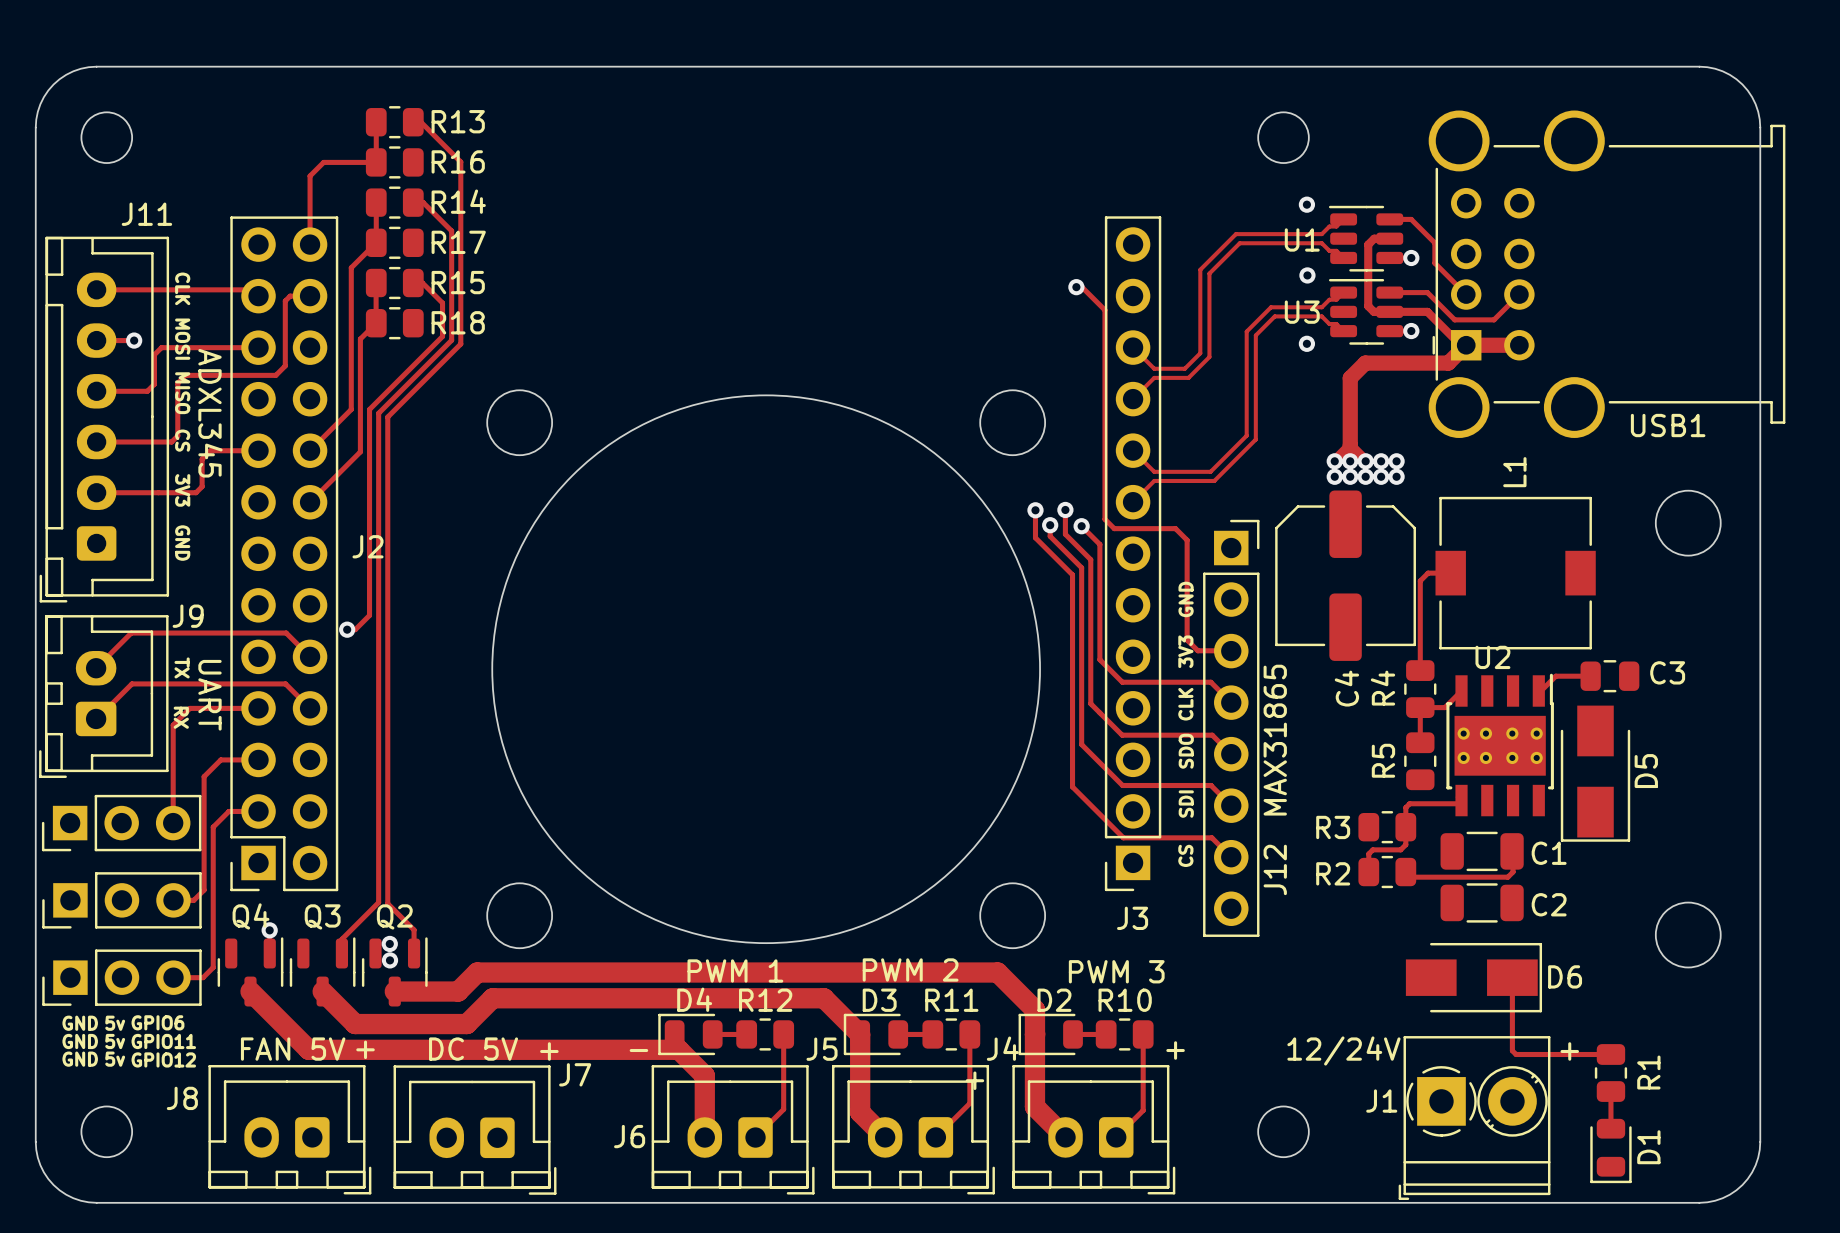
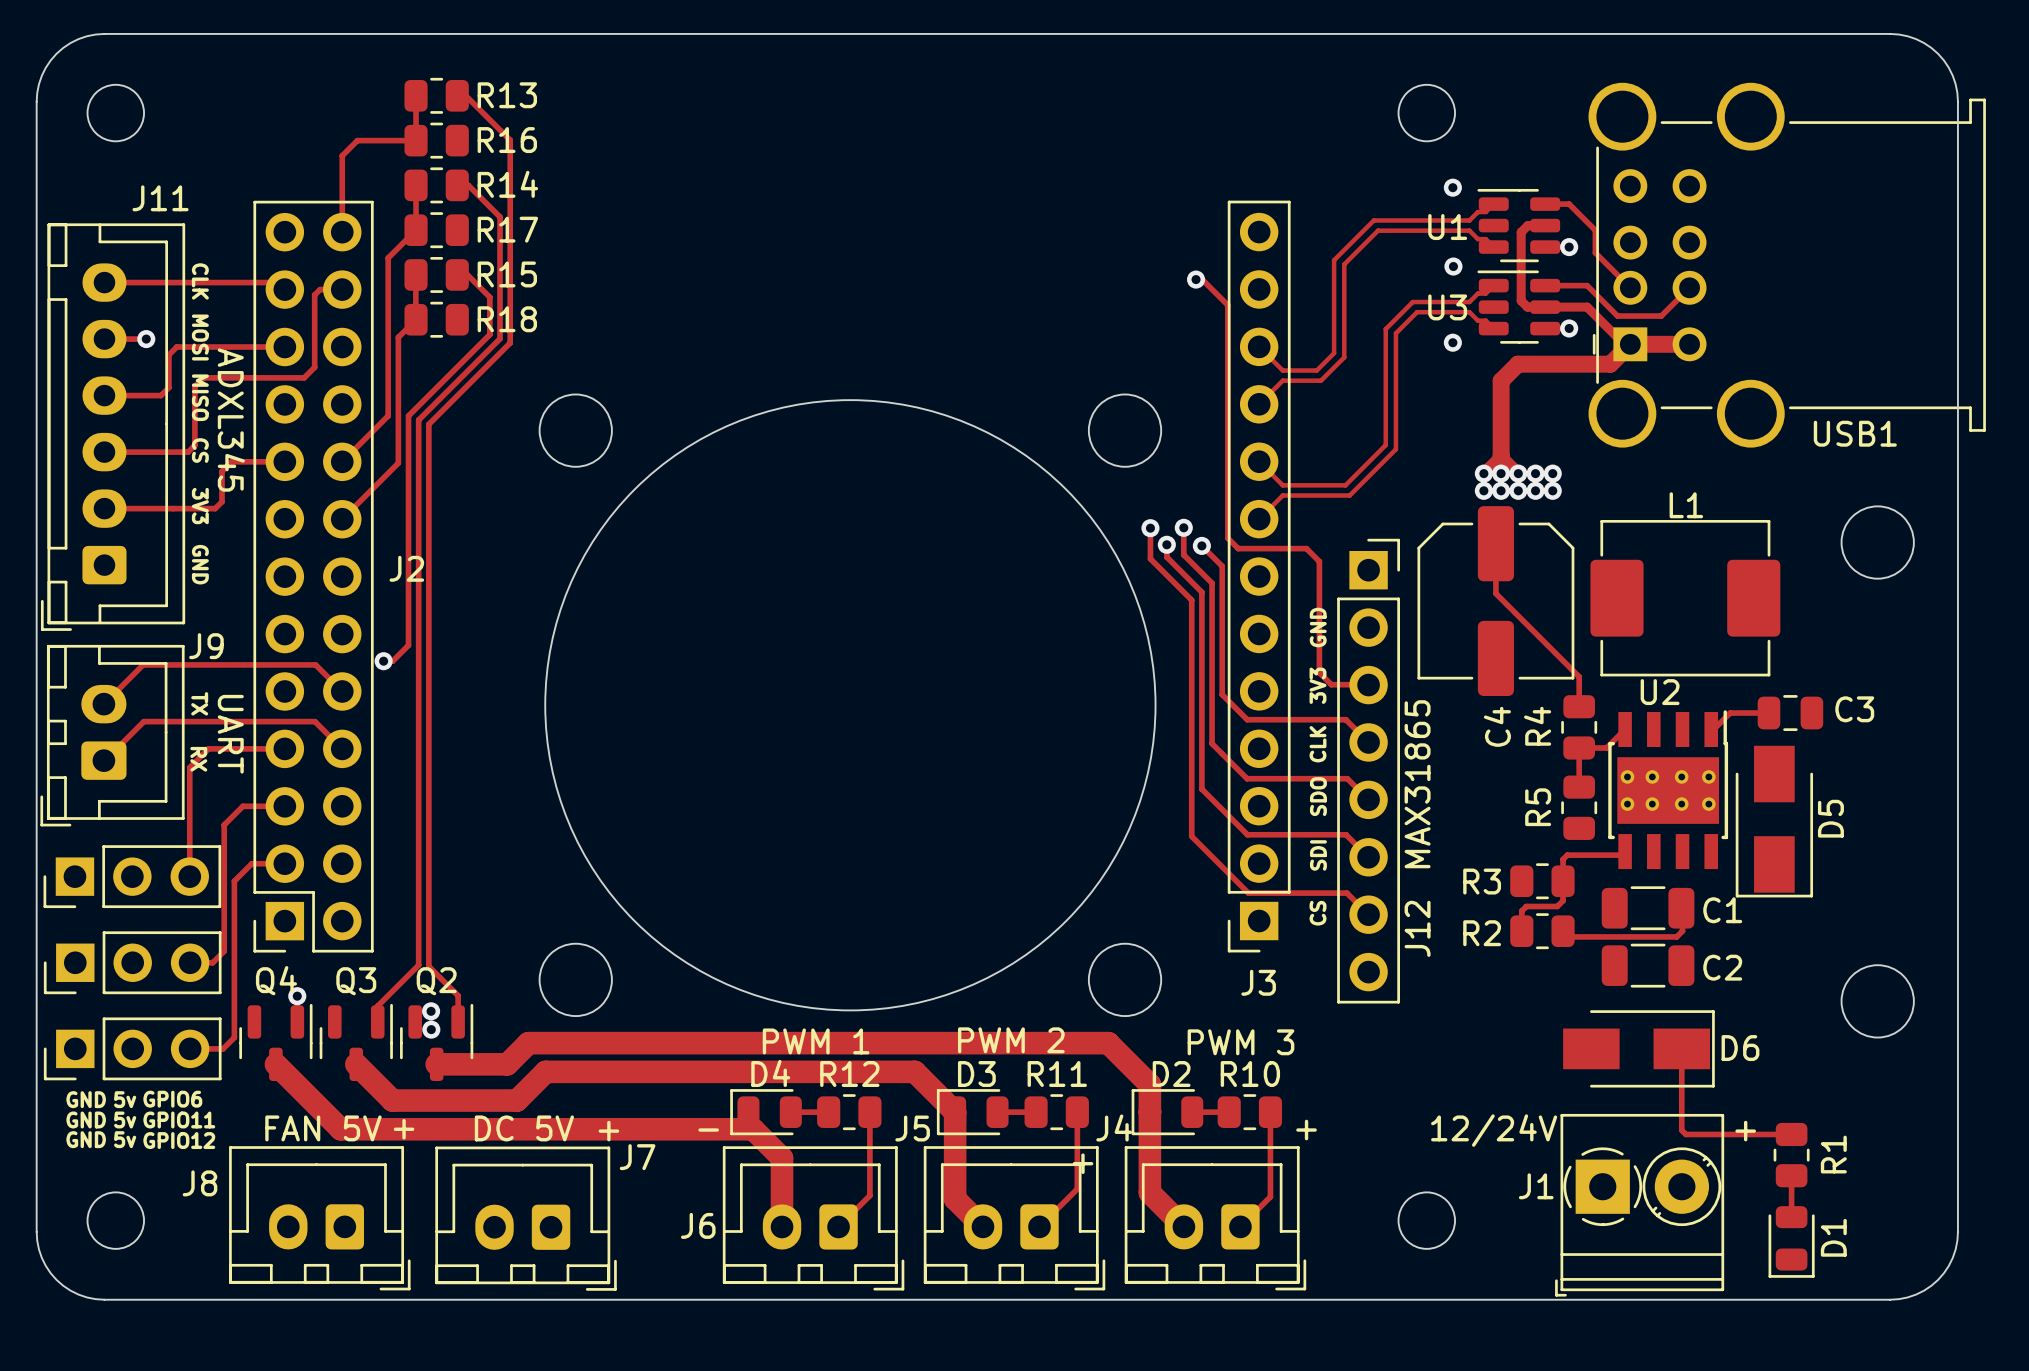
L1 name rotation: 0° (1514, 472) -> 90° clockwise (1686, 505)
L1 footprint: [1435, 496, 1596, 650] -> [1590, 519, 1781, 677]
track: (1450, 573) (1428, 573) (1420, 580) (1420, 643) -> (1495, 543) (1495, 593) (1579, 676)

